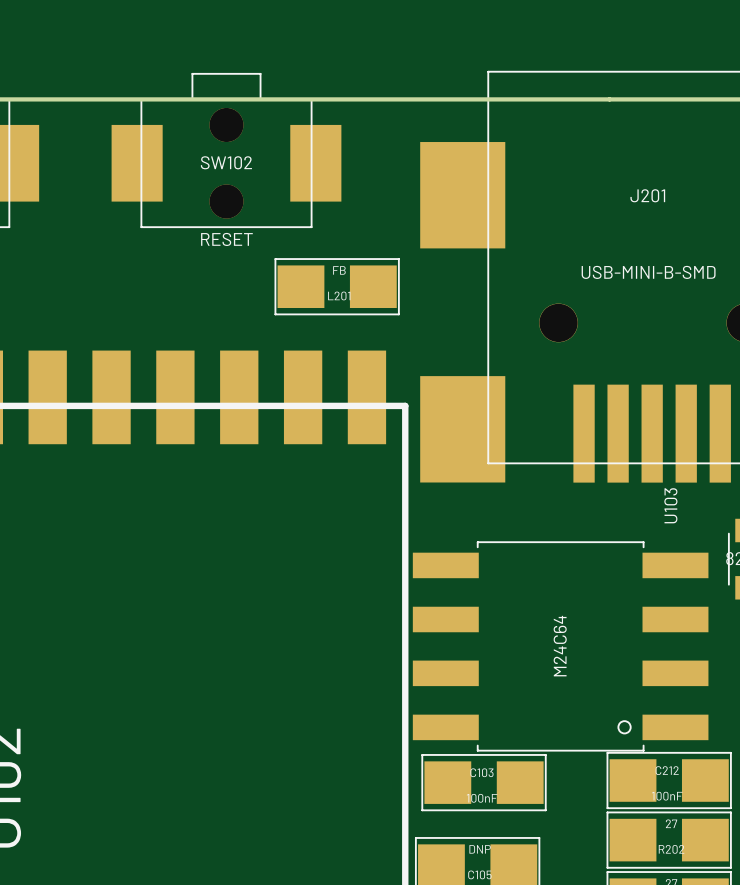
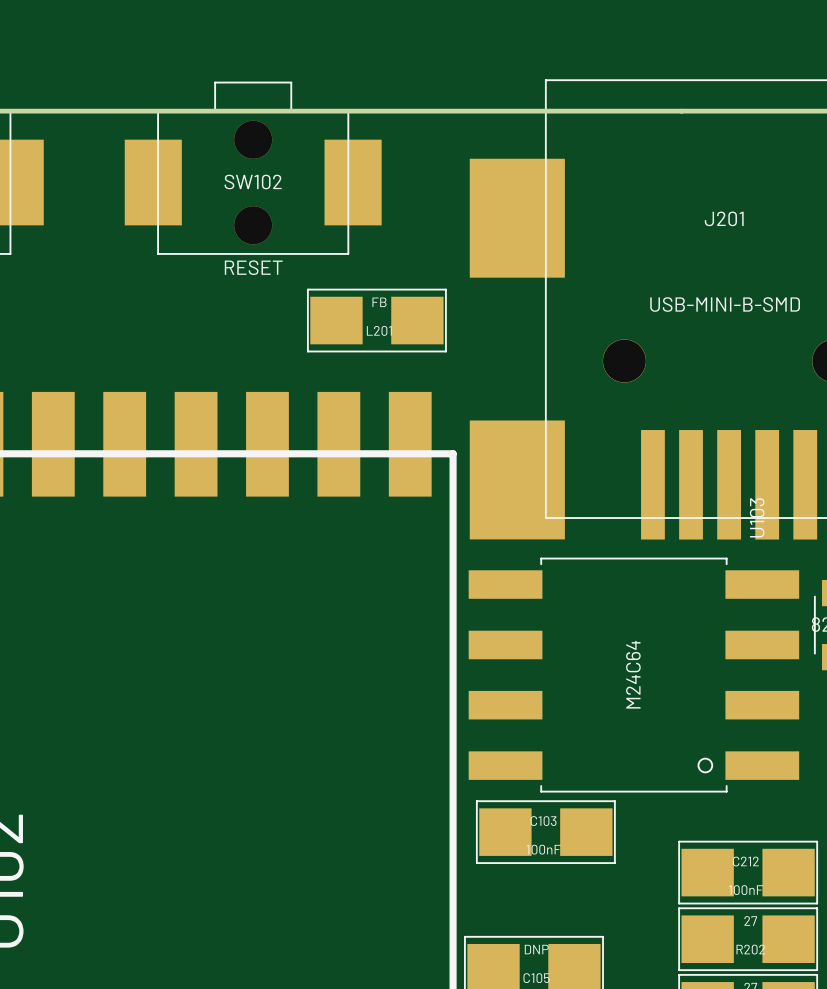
U103 position: (560, 646) -> (633, 675)
C103 position: (484, 782) -> (545, 832)

